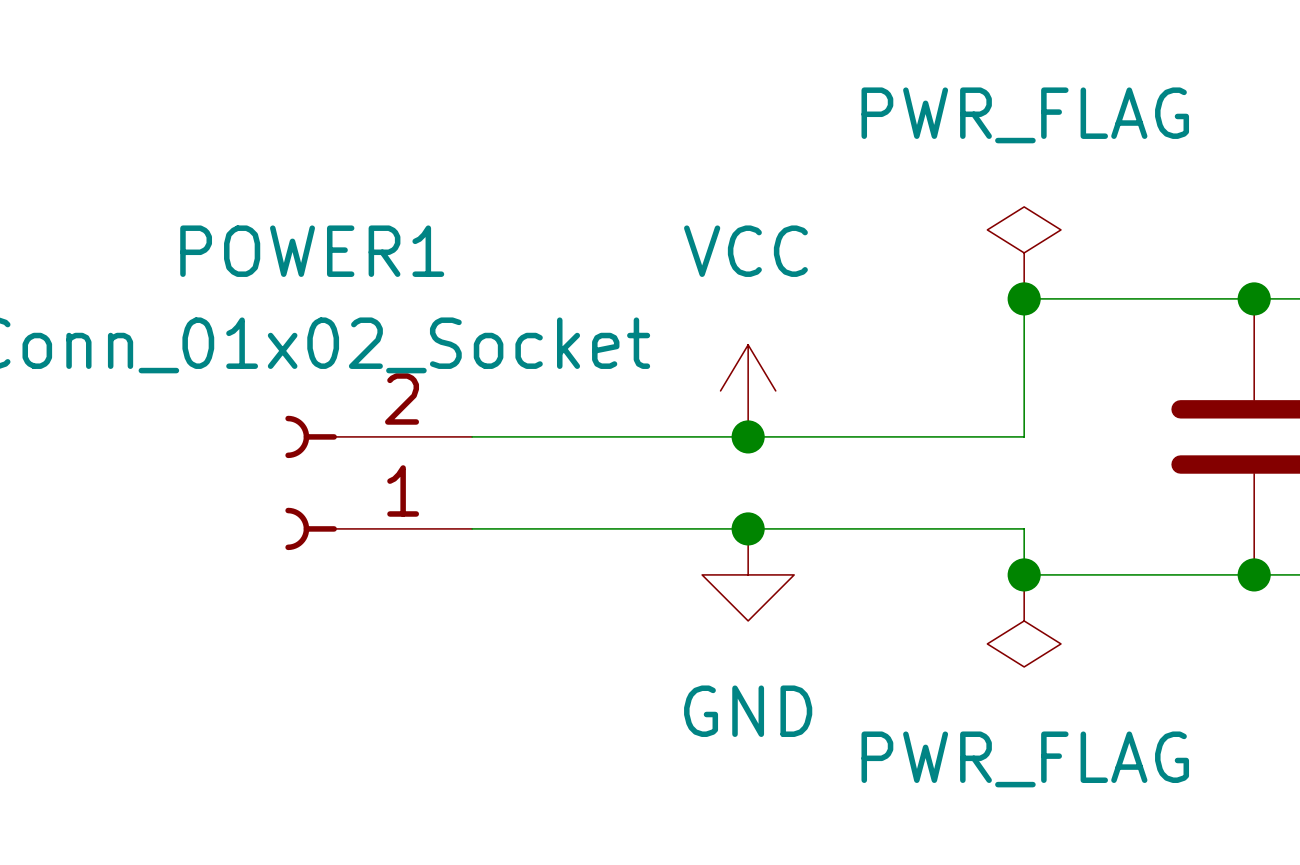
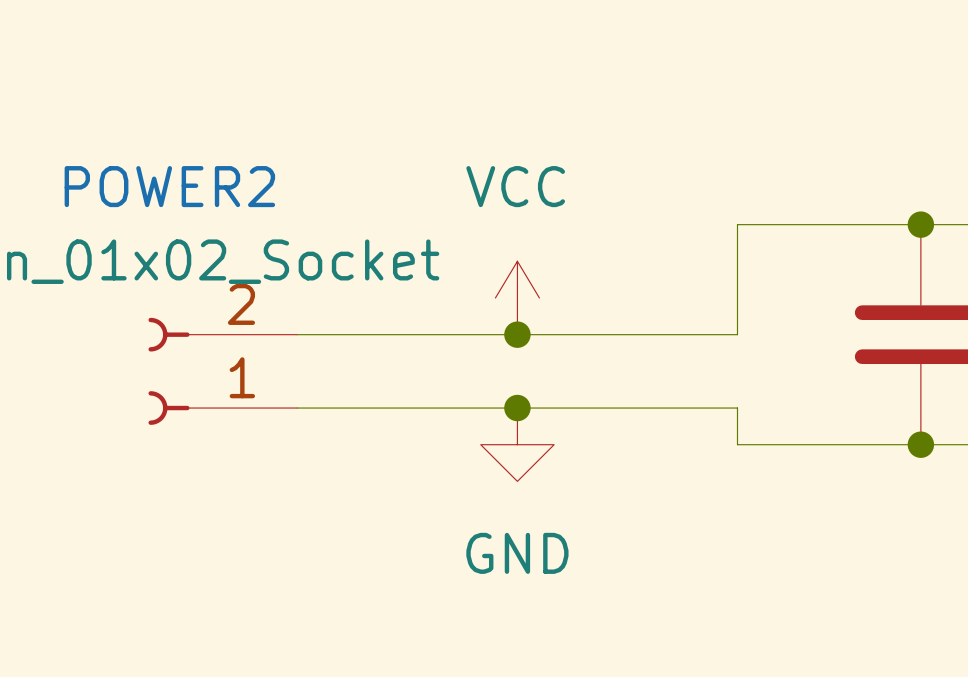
POWER1 name: POWER1 (312, 251) -> POWER2 (169, 186)
power symbol: PWR_FLAG (1024, 252) -> none
junction: (1024, 298) -> none
junction: (1024, 574) -> none
power symbol: PWR_FLAG (1024, 620) -> none

